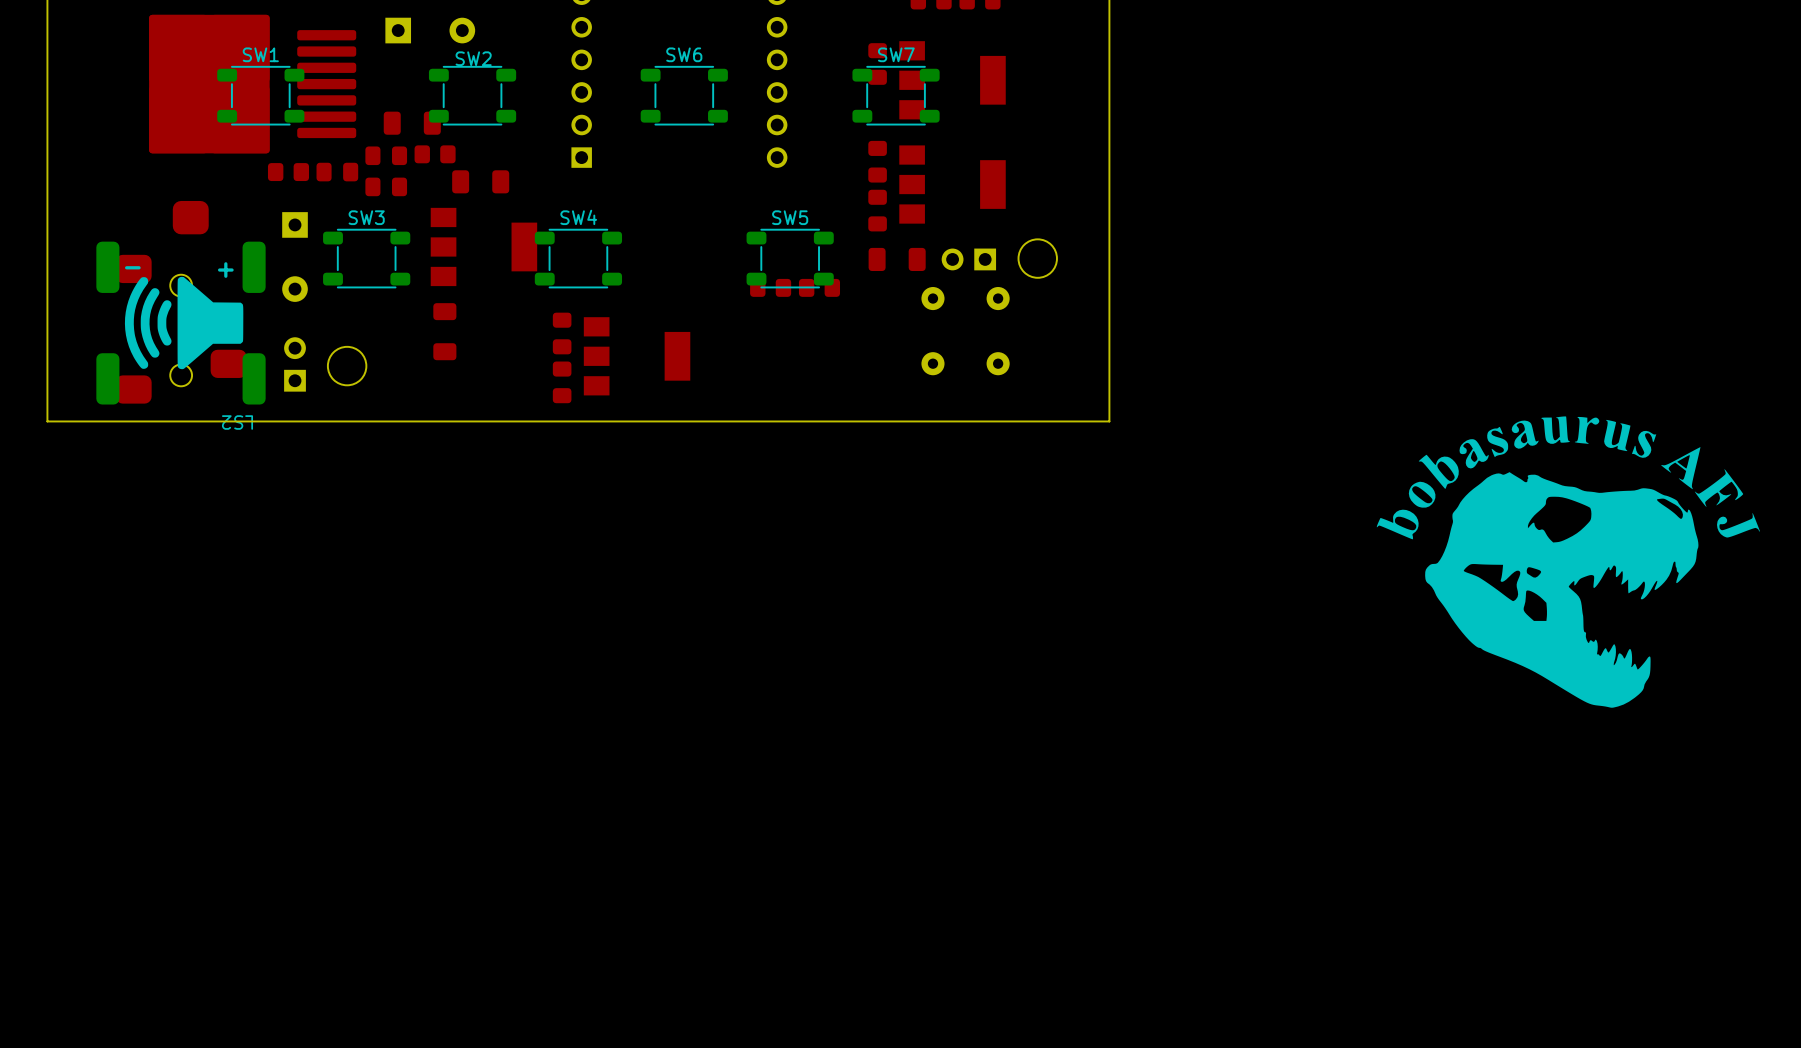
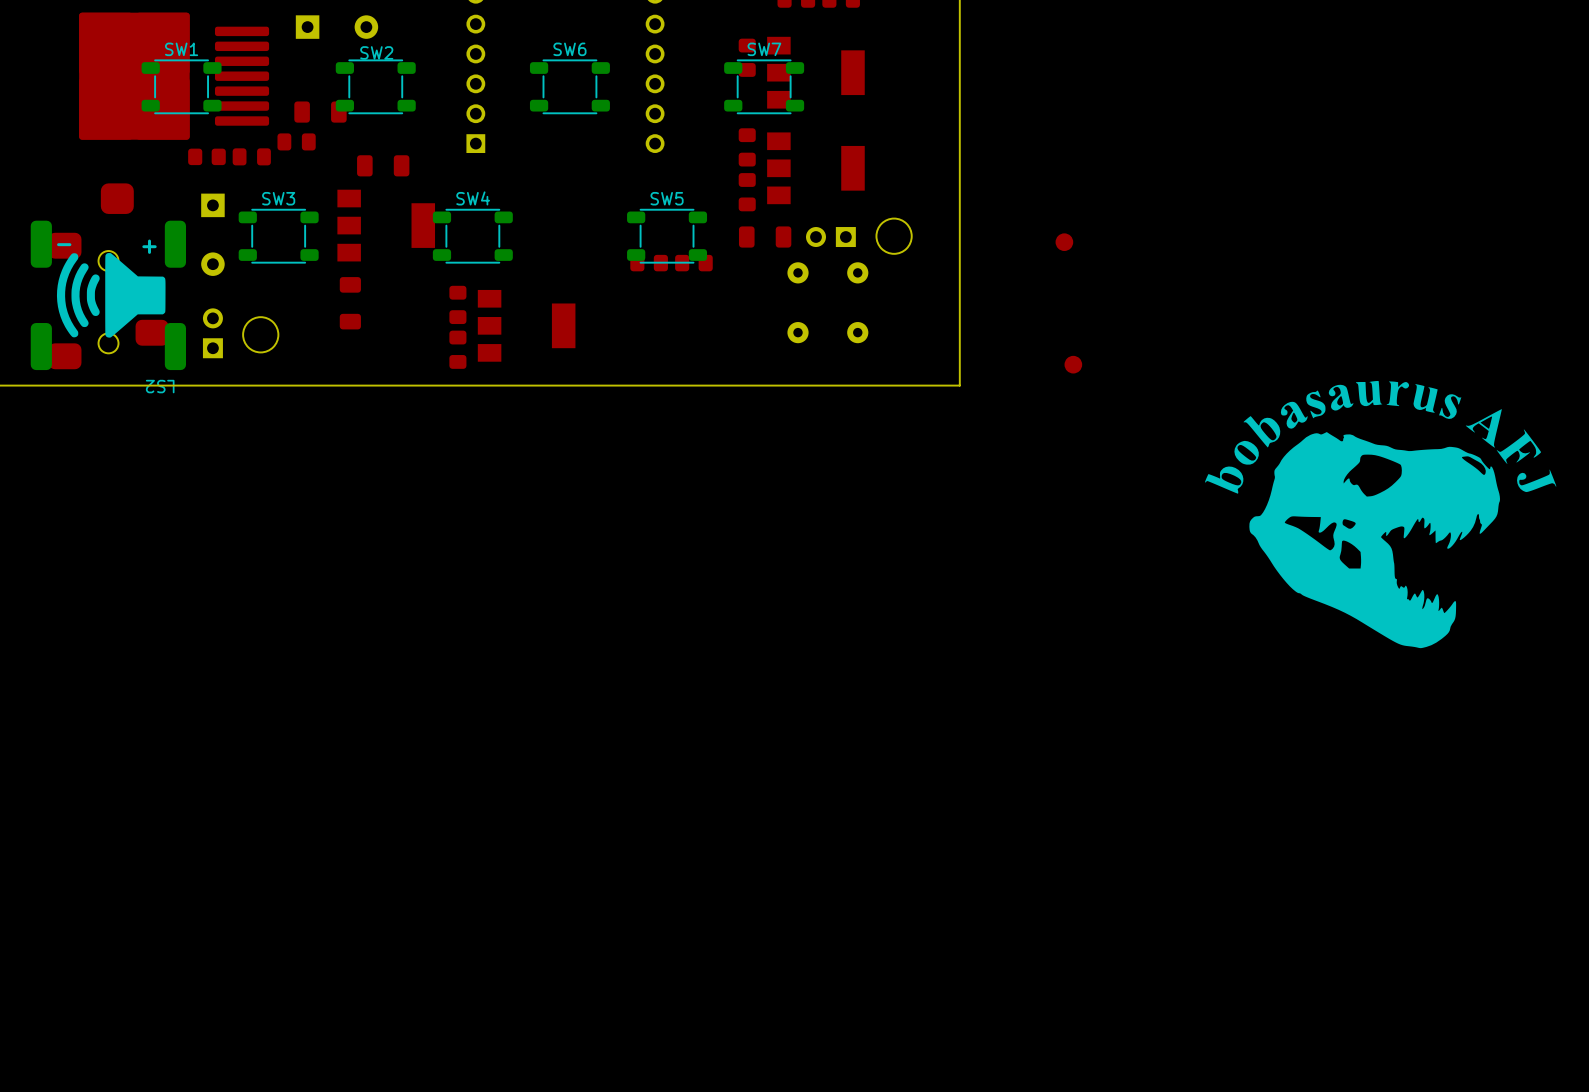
part: (435, 154) -> none
part: (386, 186) -> none
part: none -> (1064, 242)
part: none -> (1073, 364)

